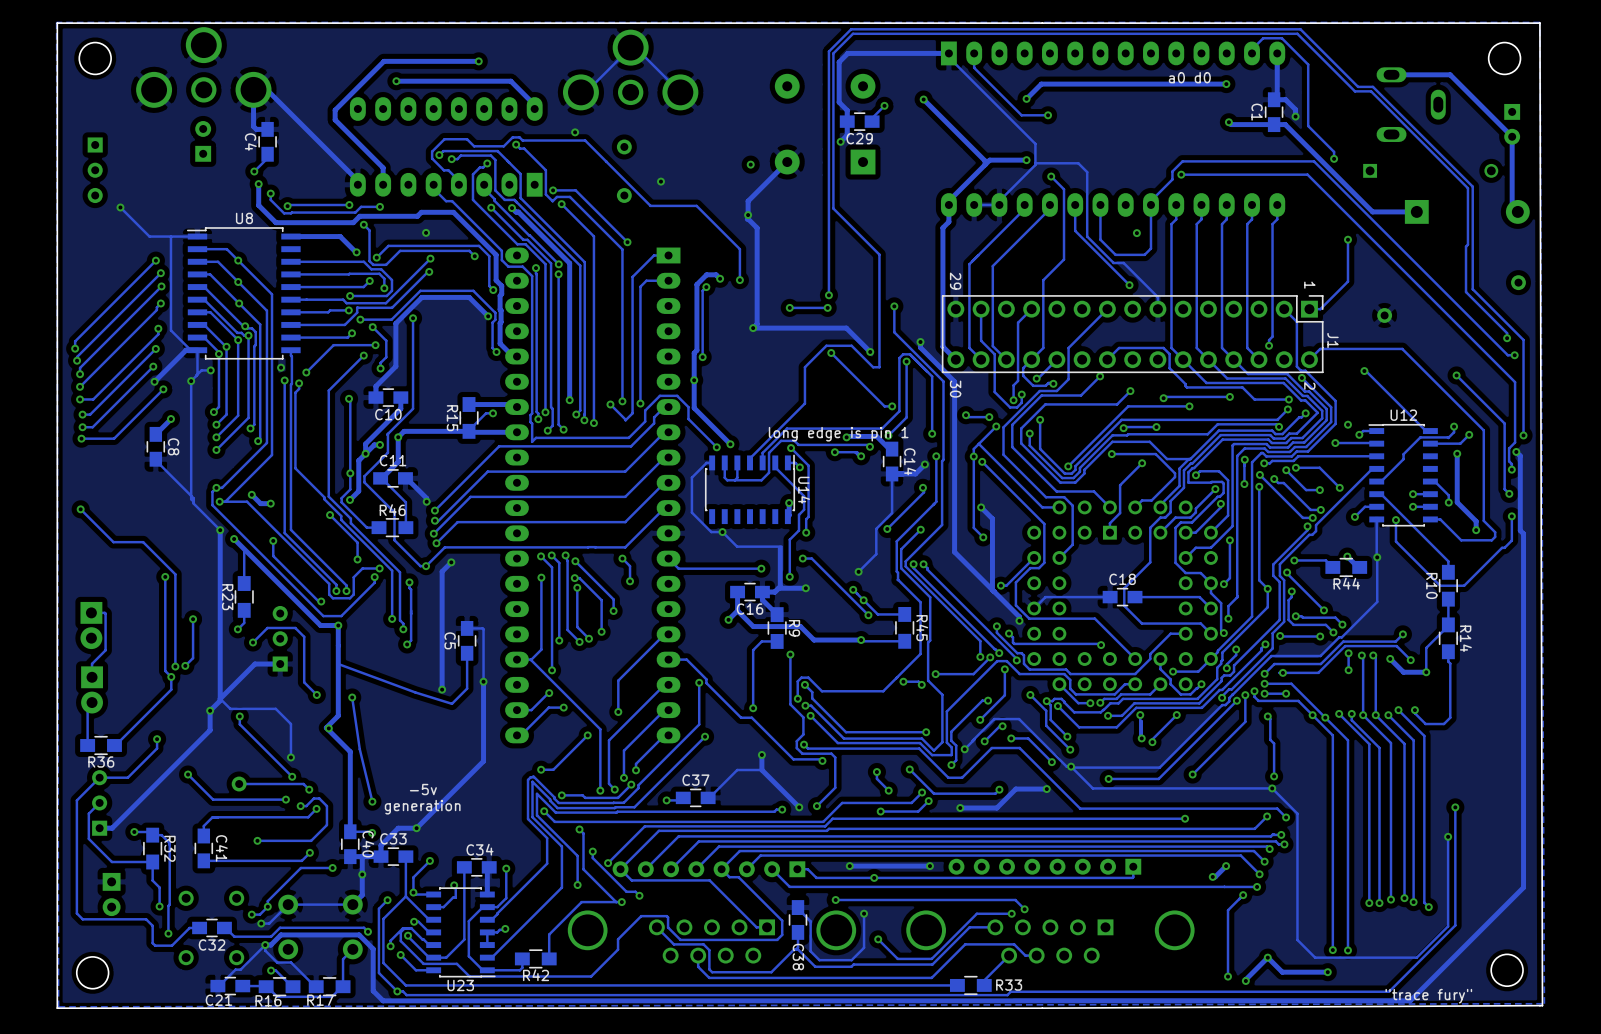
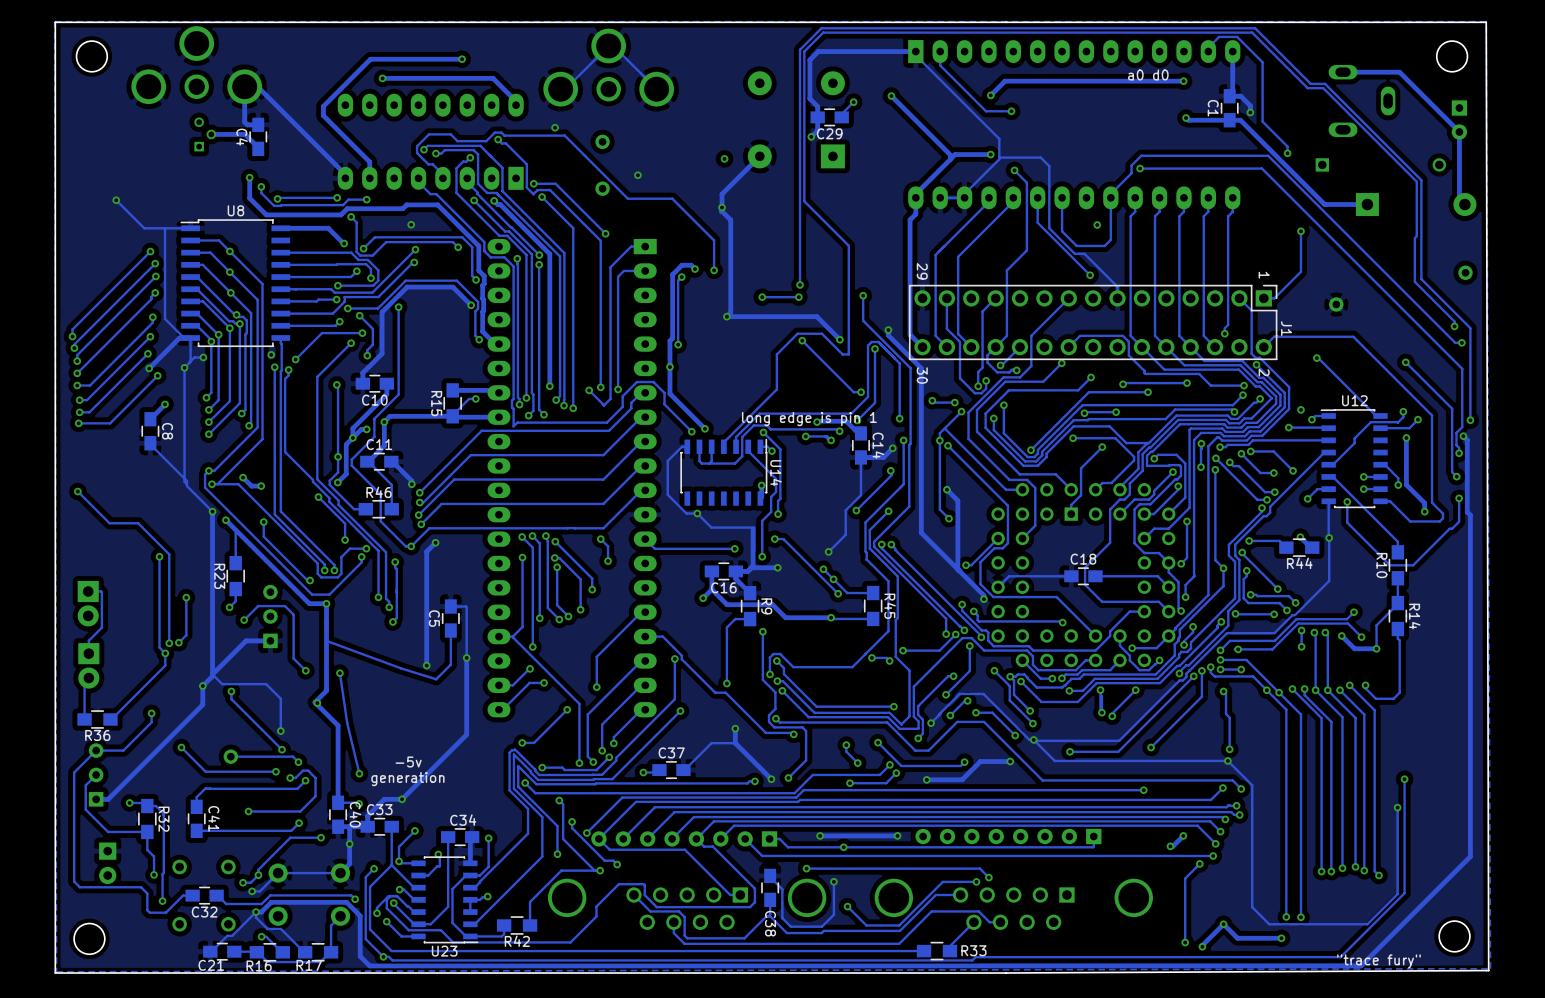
part footprint: [195, 121, 212, 162] -> [194, 117, 217, 152]
track: none -> (211, 134) (245, 134) (258, 147)
track: (267, 154) (267, 158) (254, 171) -> none
part: (95, 170) -> none
via: (254, 171) -> none

